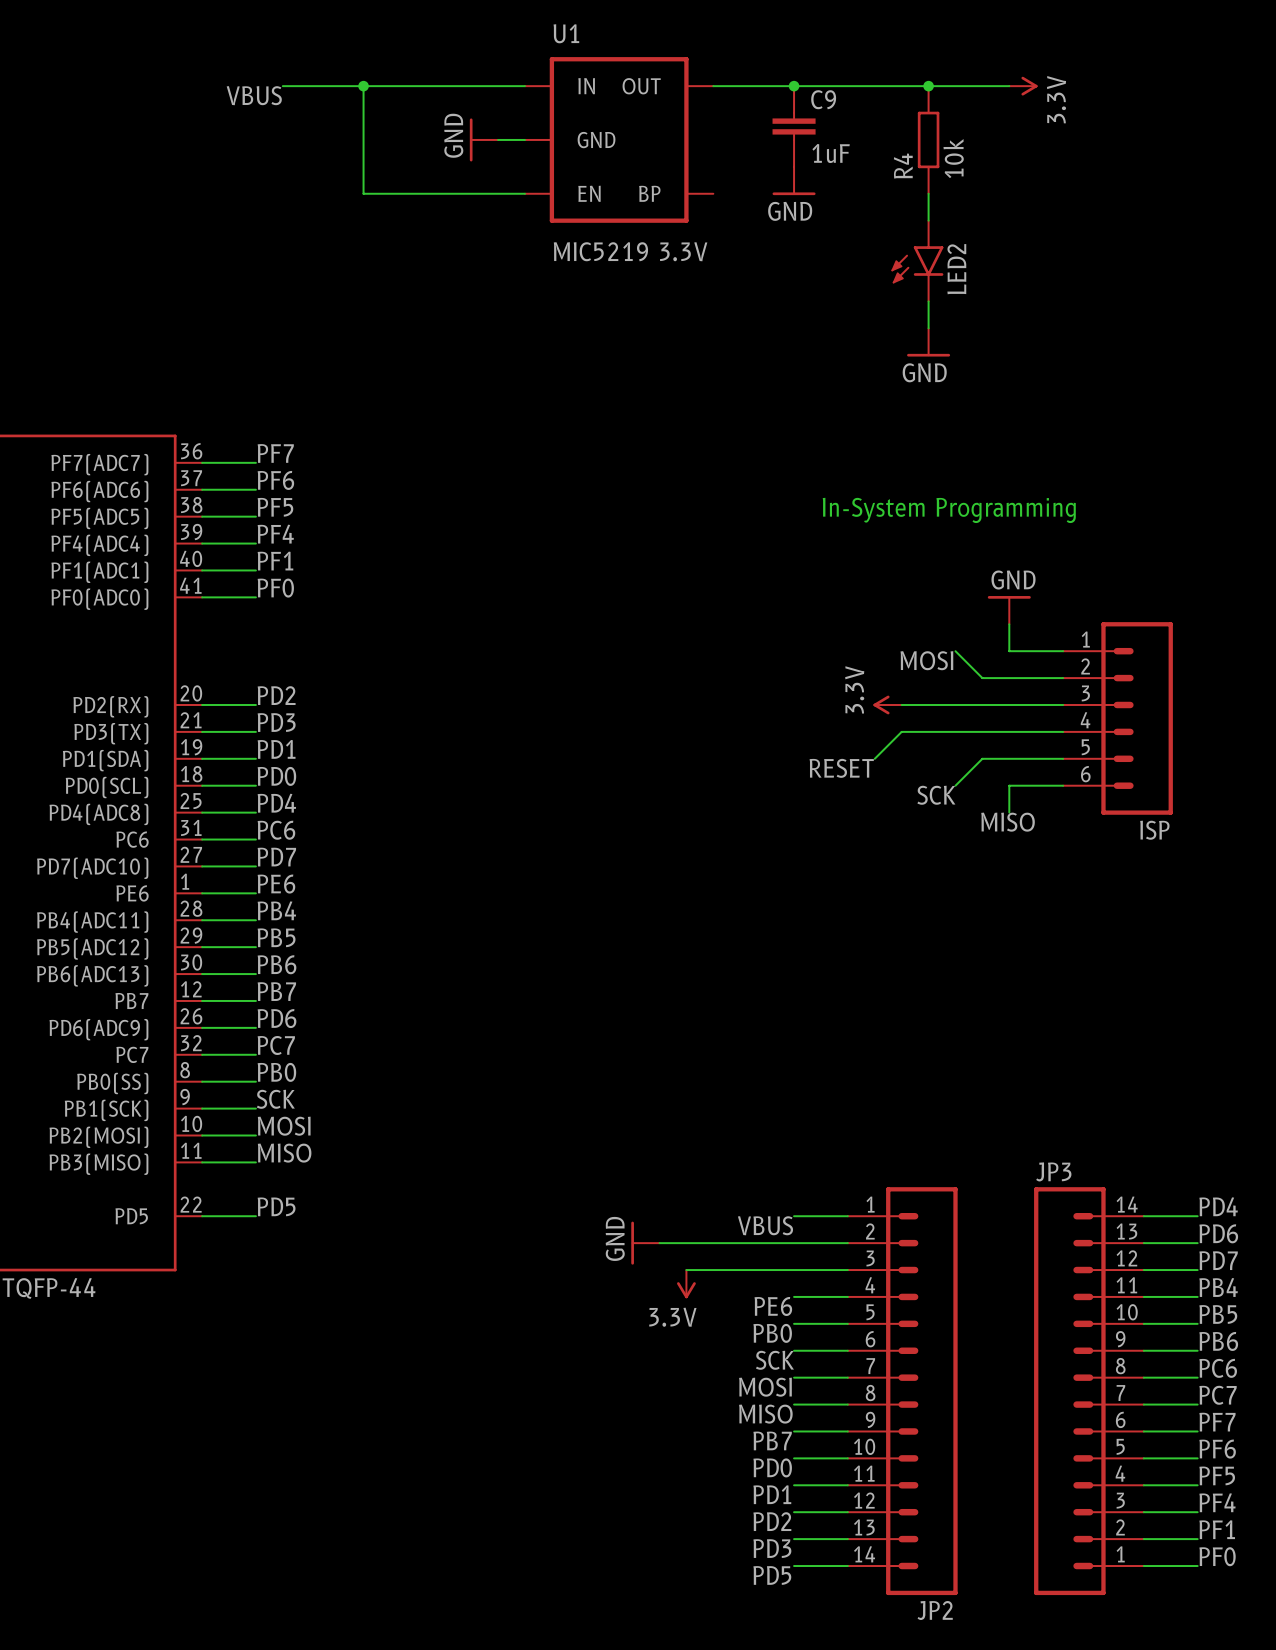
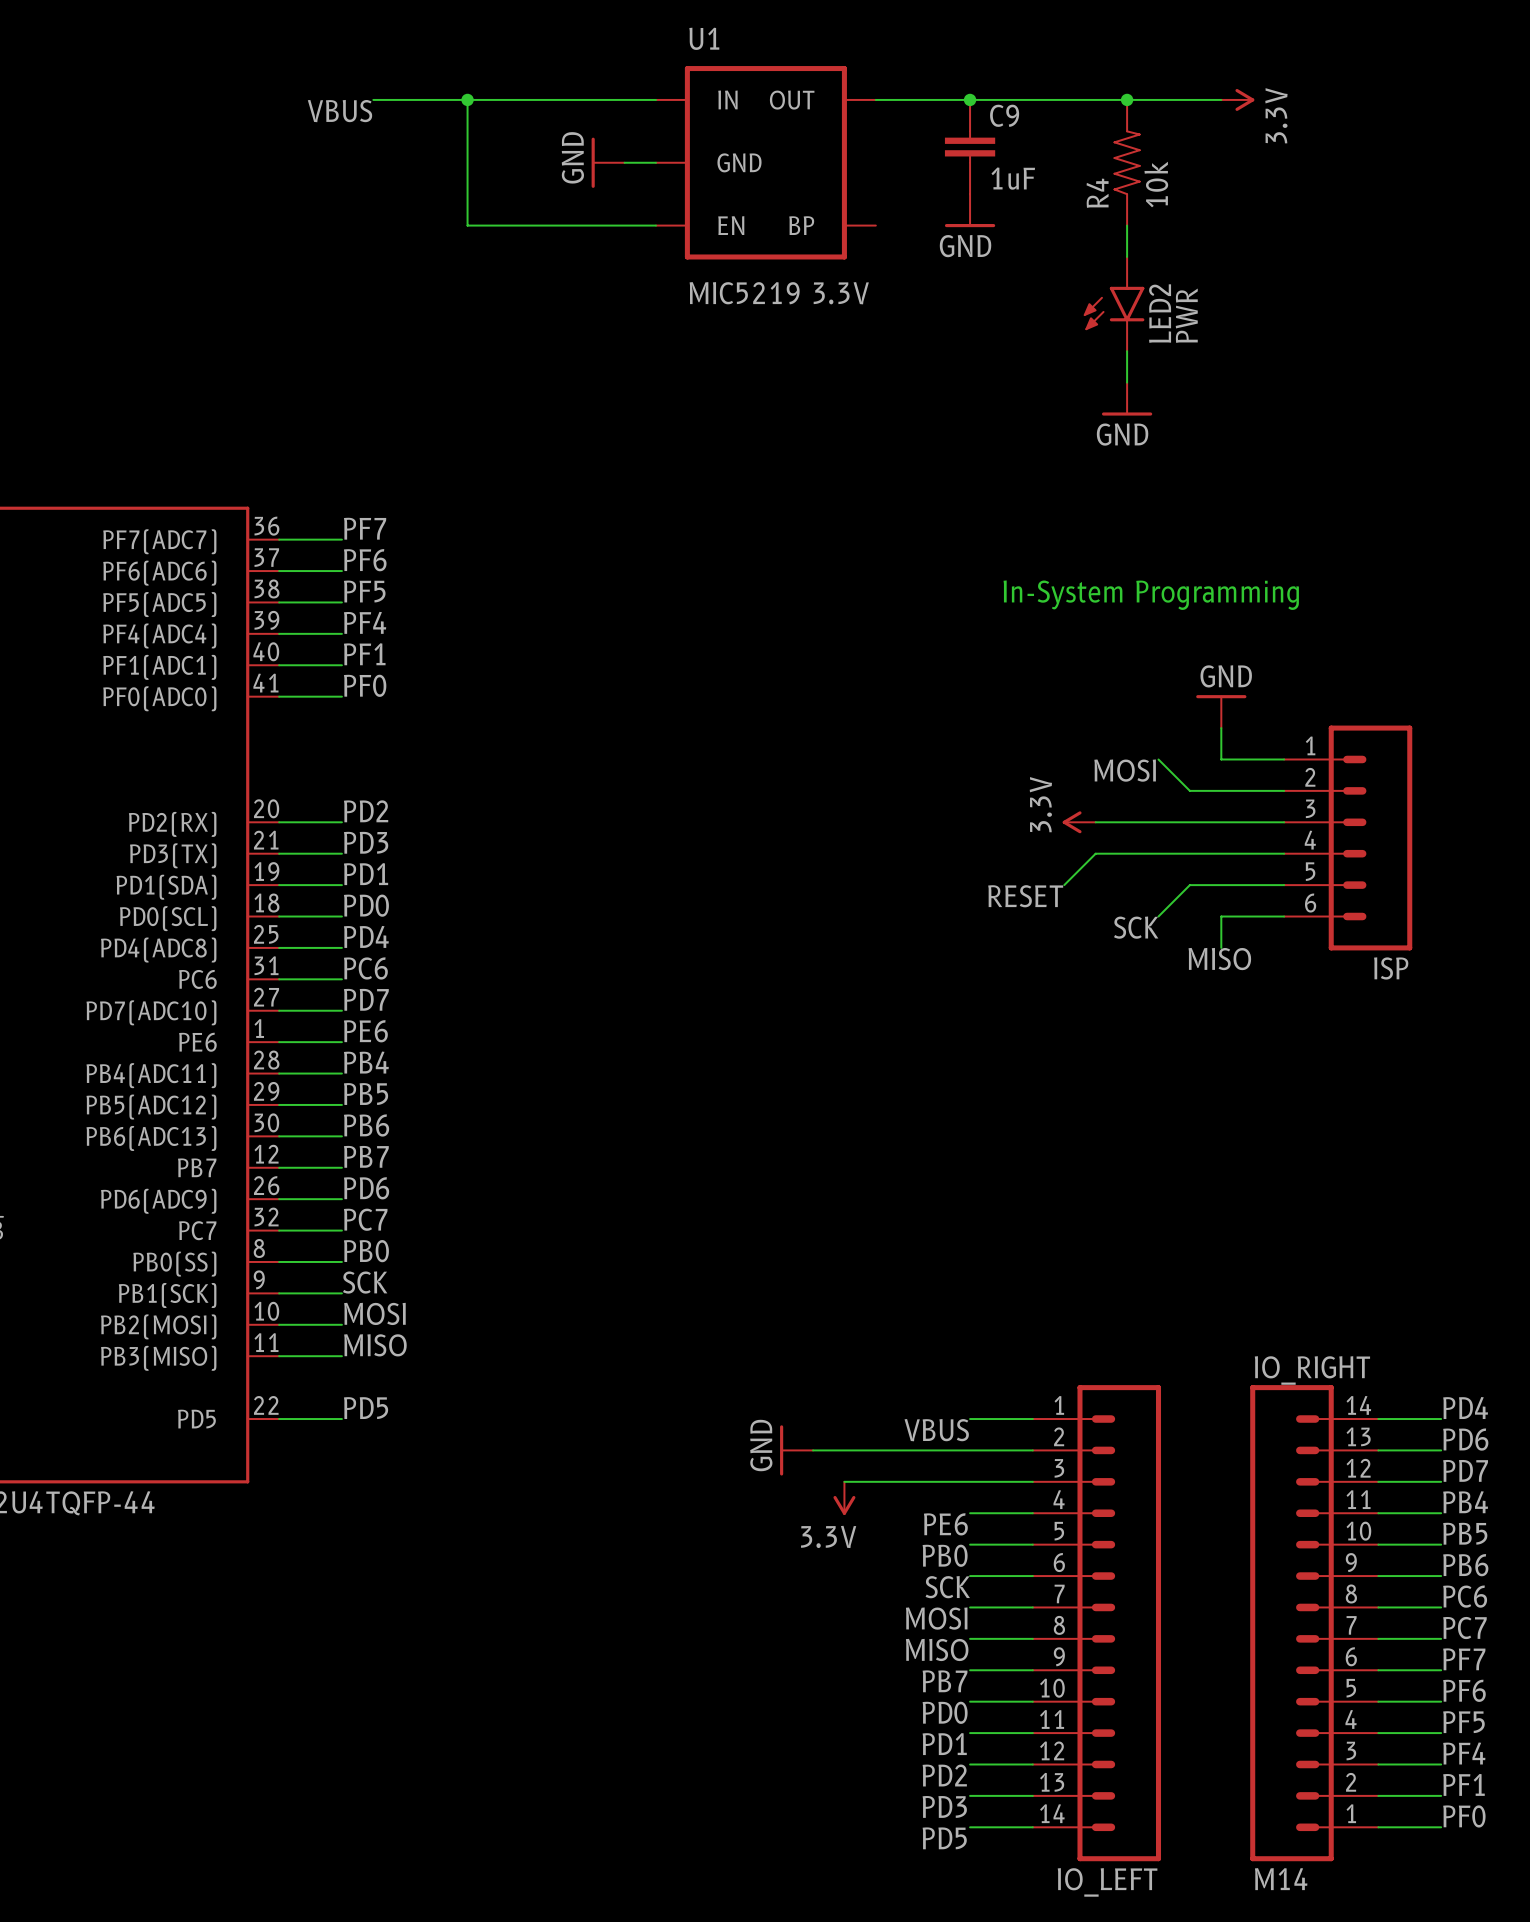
R4 symbol: [917, 86, 940, 194] -> [1113, 99, 1141, 226]
LED2 value: none -> PWR (1186, 315)
JP3 name: JP3 (1053, 1171) -> IO_RIGHT (1312, 1370)
JP2 name: JP2 (935, 1610) -> IO_LEFT (1107, 1882)
JP3 value: none -> M14 (1281, 1879)

